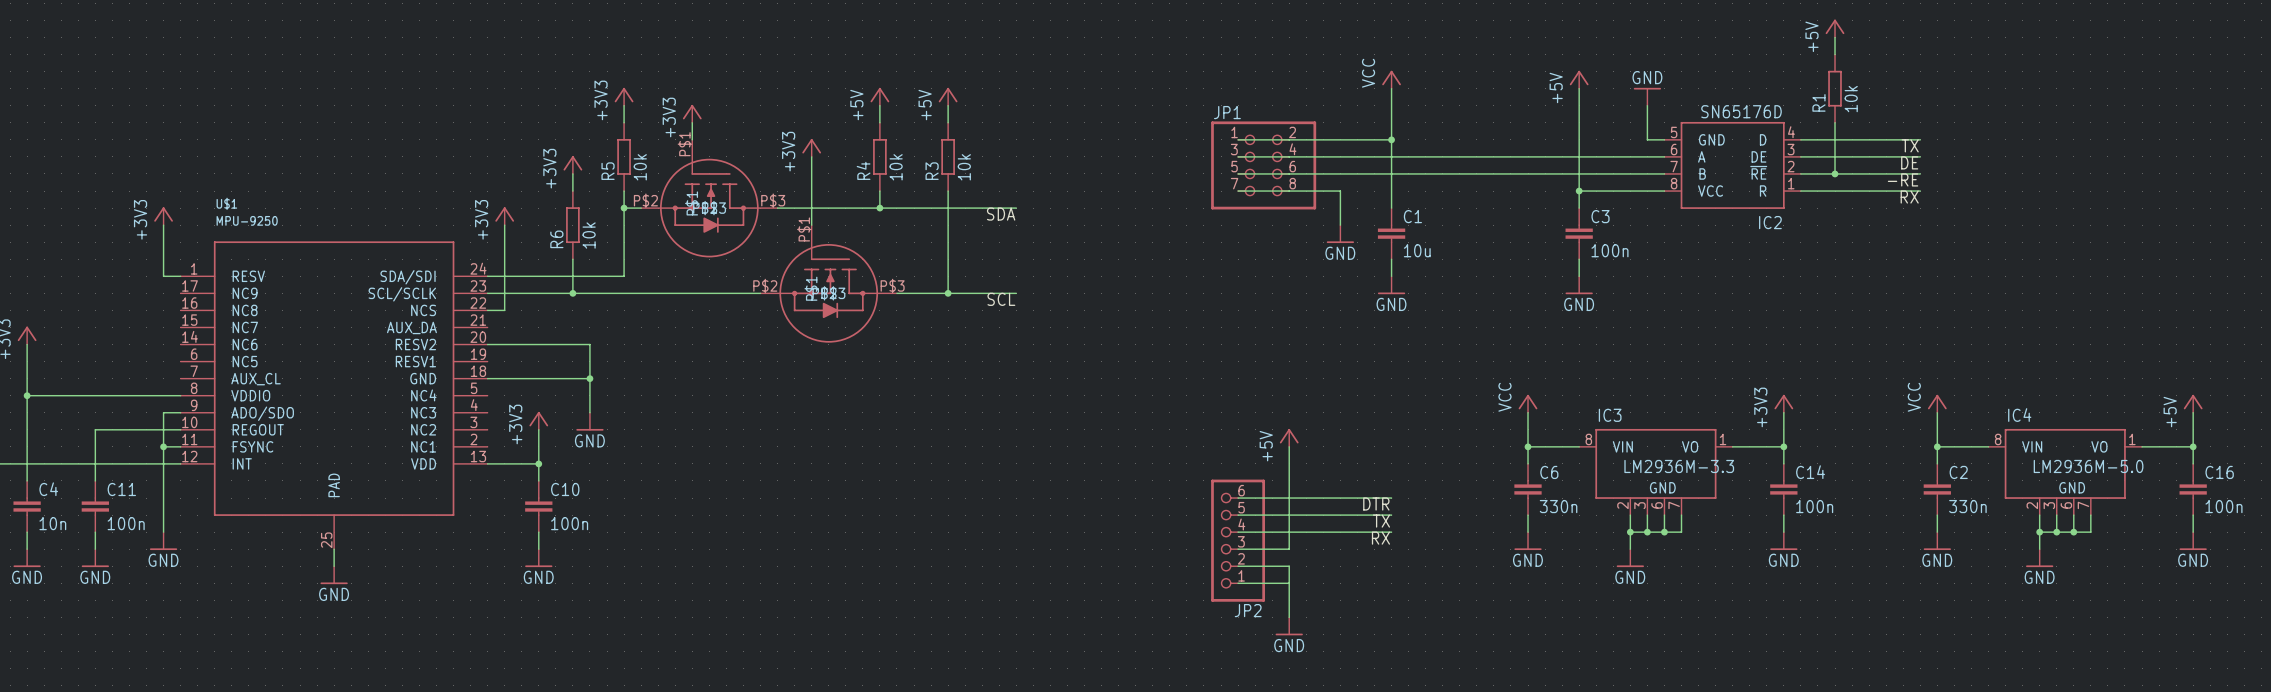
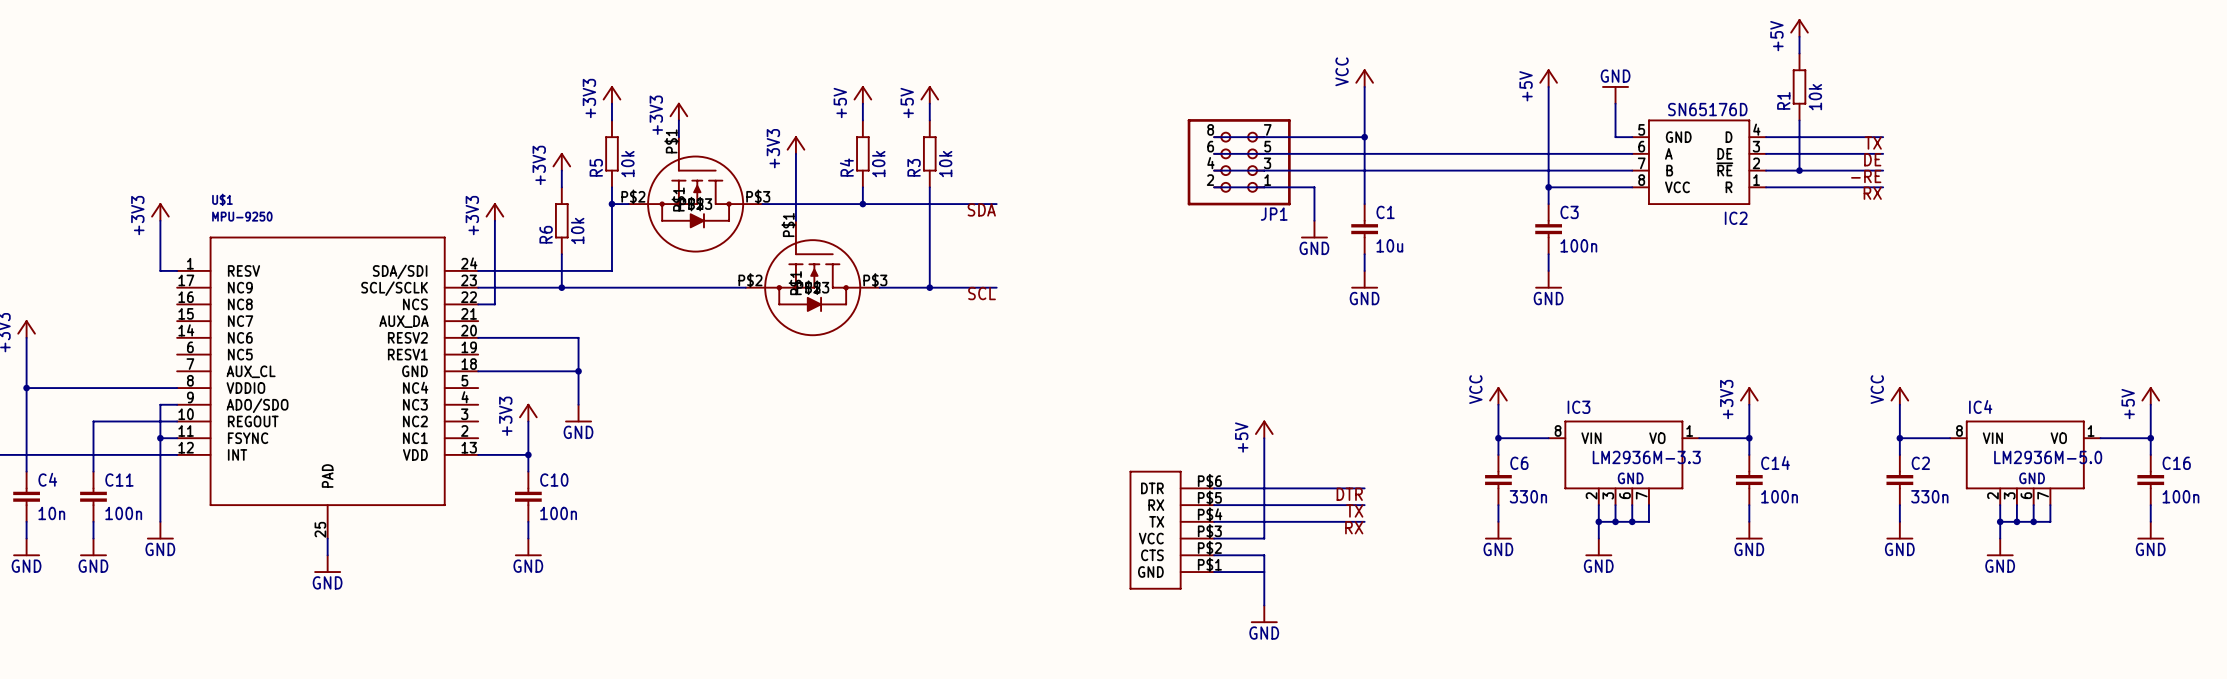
JP1 rotation: 0° (1263, 165) -> 180° (1239, 162)
part: none -> (1171, 530)
JP2: (1238, 540) -> none

